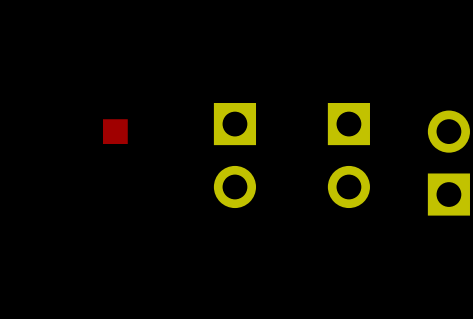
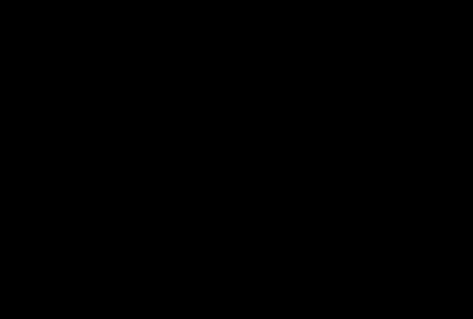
part: (115, 131) -> none
part: (234, 155) -> none
part: (348, 155) -> none
part: (448, 163) -> none

